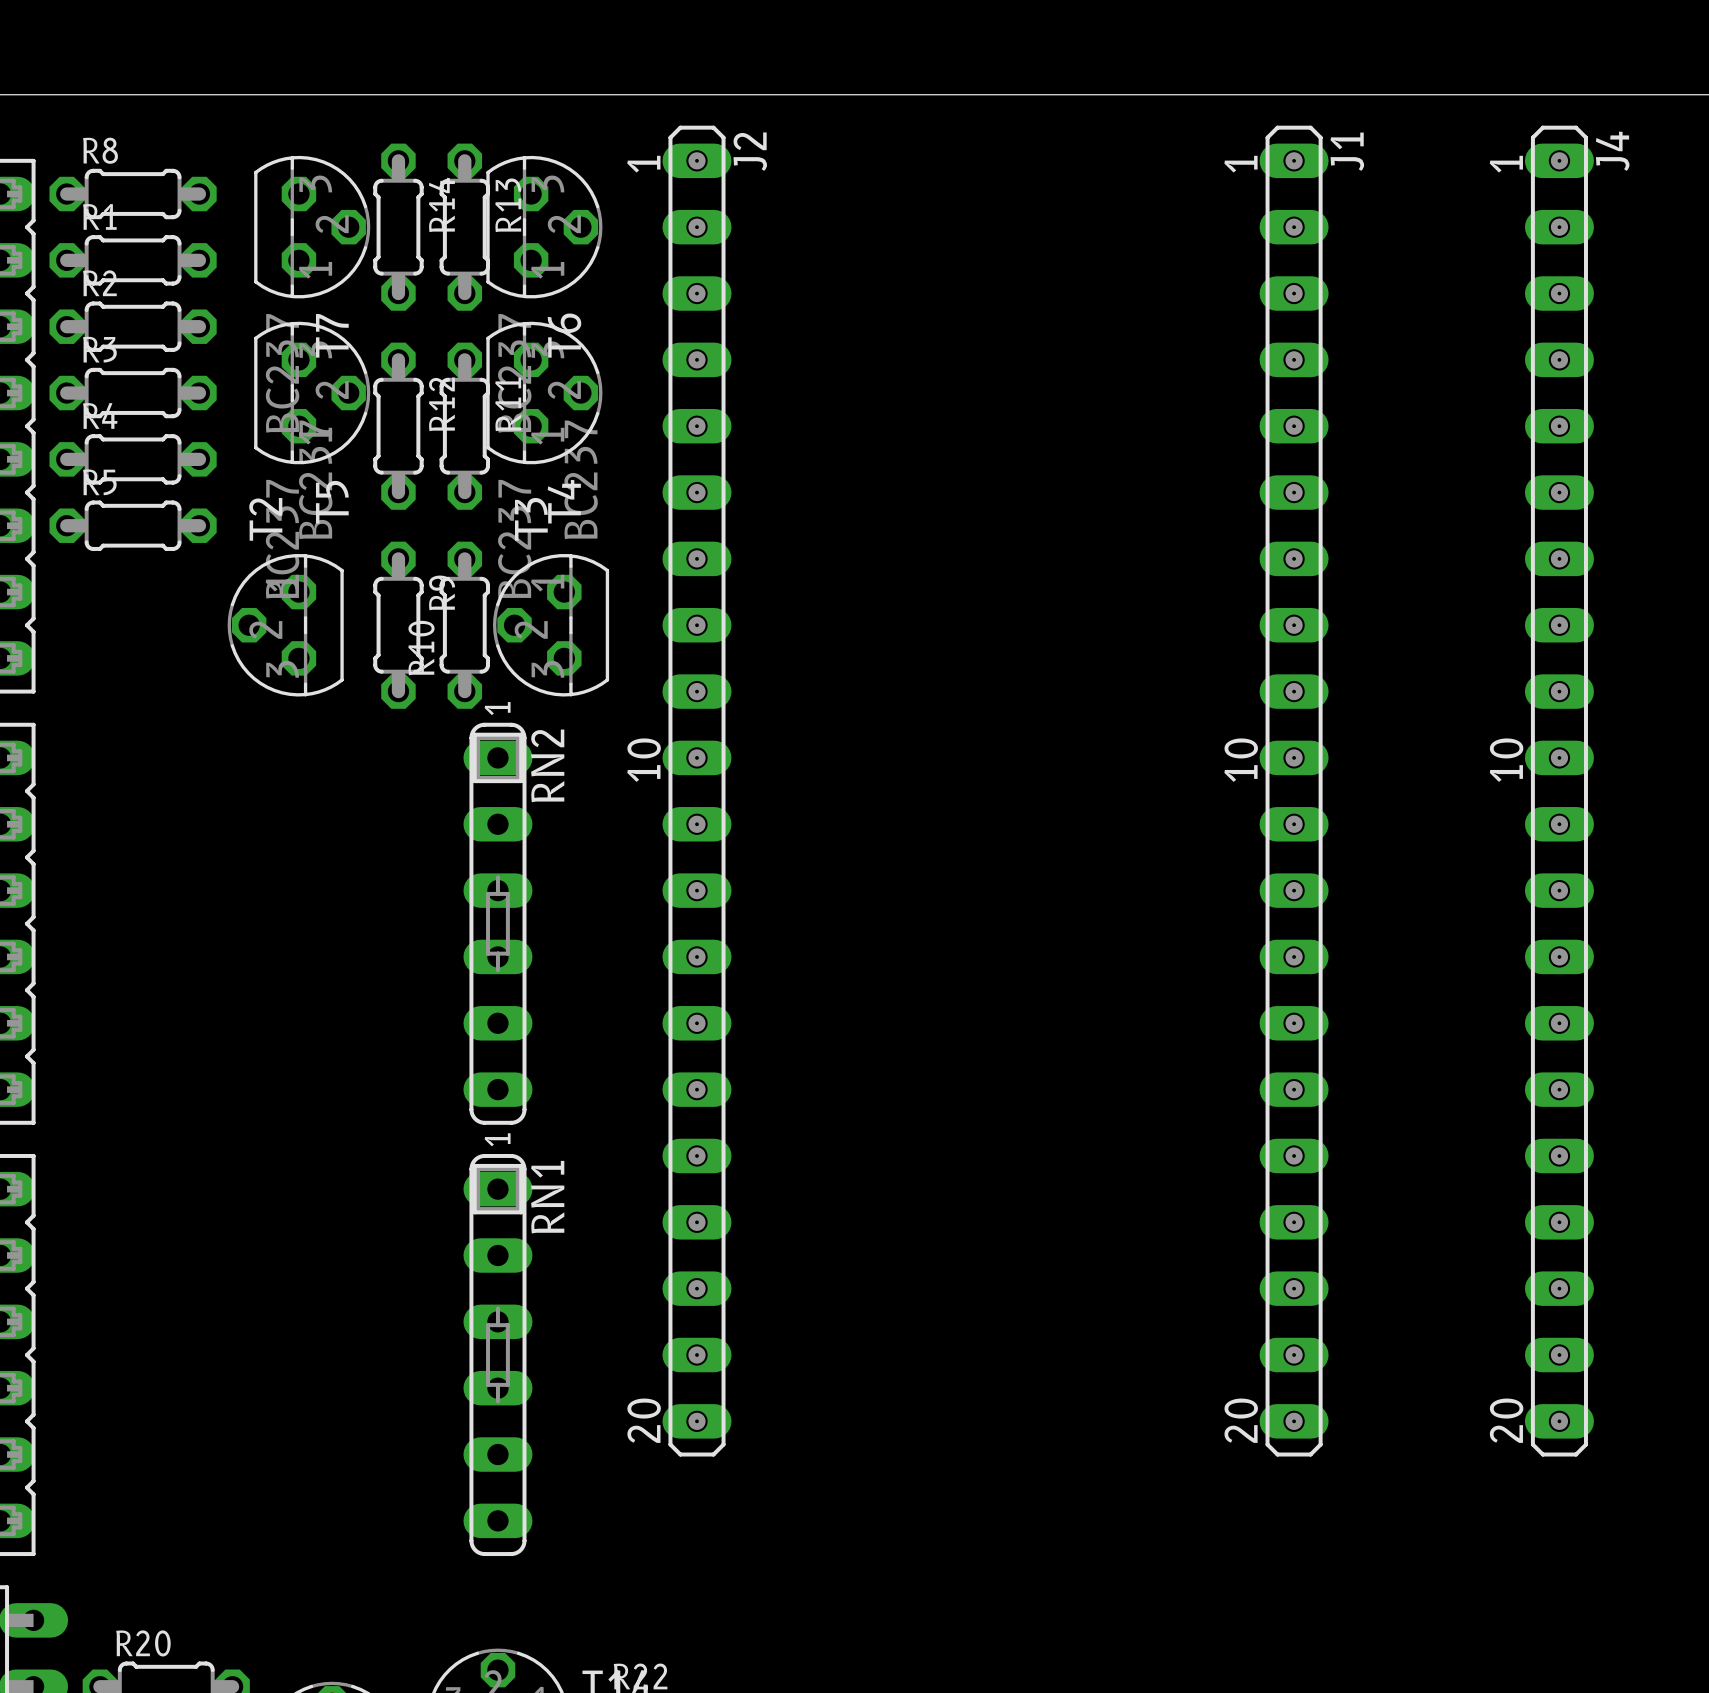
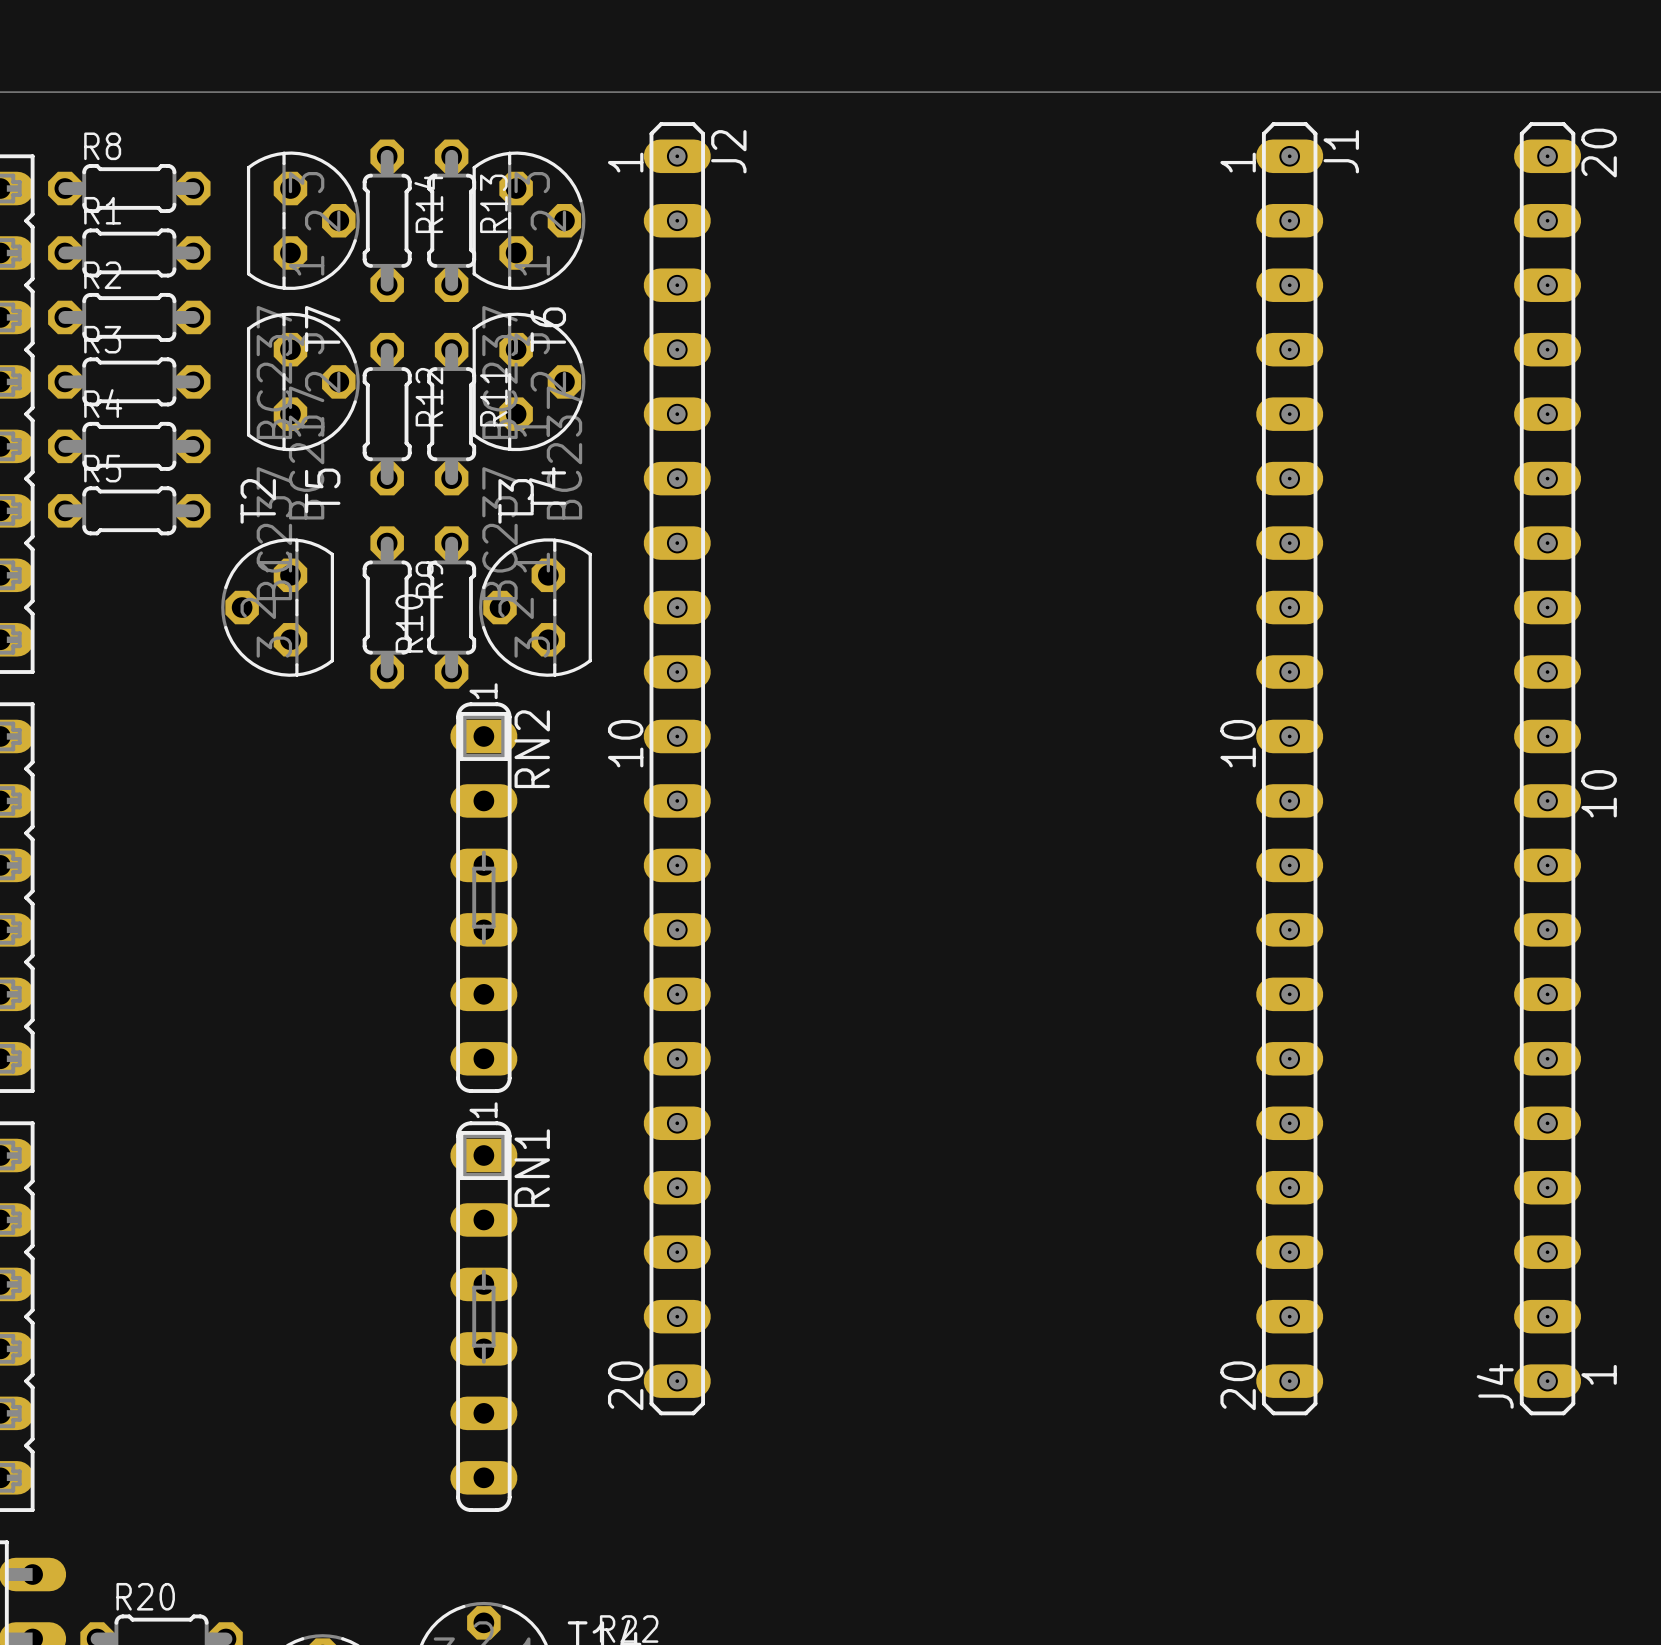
J4 name position: J4 (1612, 151) -> J4 (1495, 1386)
J4 text position: 1 (1506, 164) -> 1 (1599, 1374)
J4 text position: 10 (1506, 760) -> 10 (1599, 793)
J1 position: (1294, 791) -> (1289, 768)
J4 position: (1559, 791) -> (1547, 768)
J4 text position: 20 (1506, 1420) -> 20 (1599, 153)

